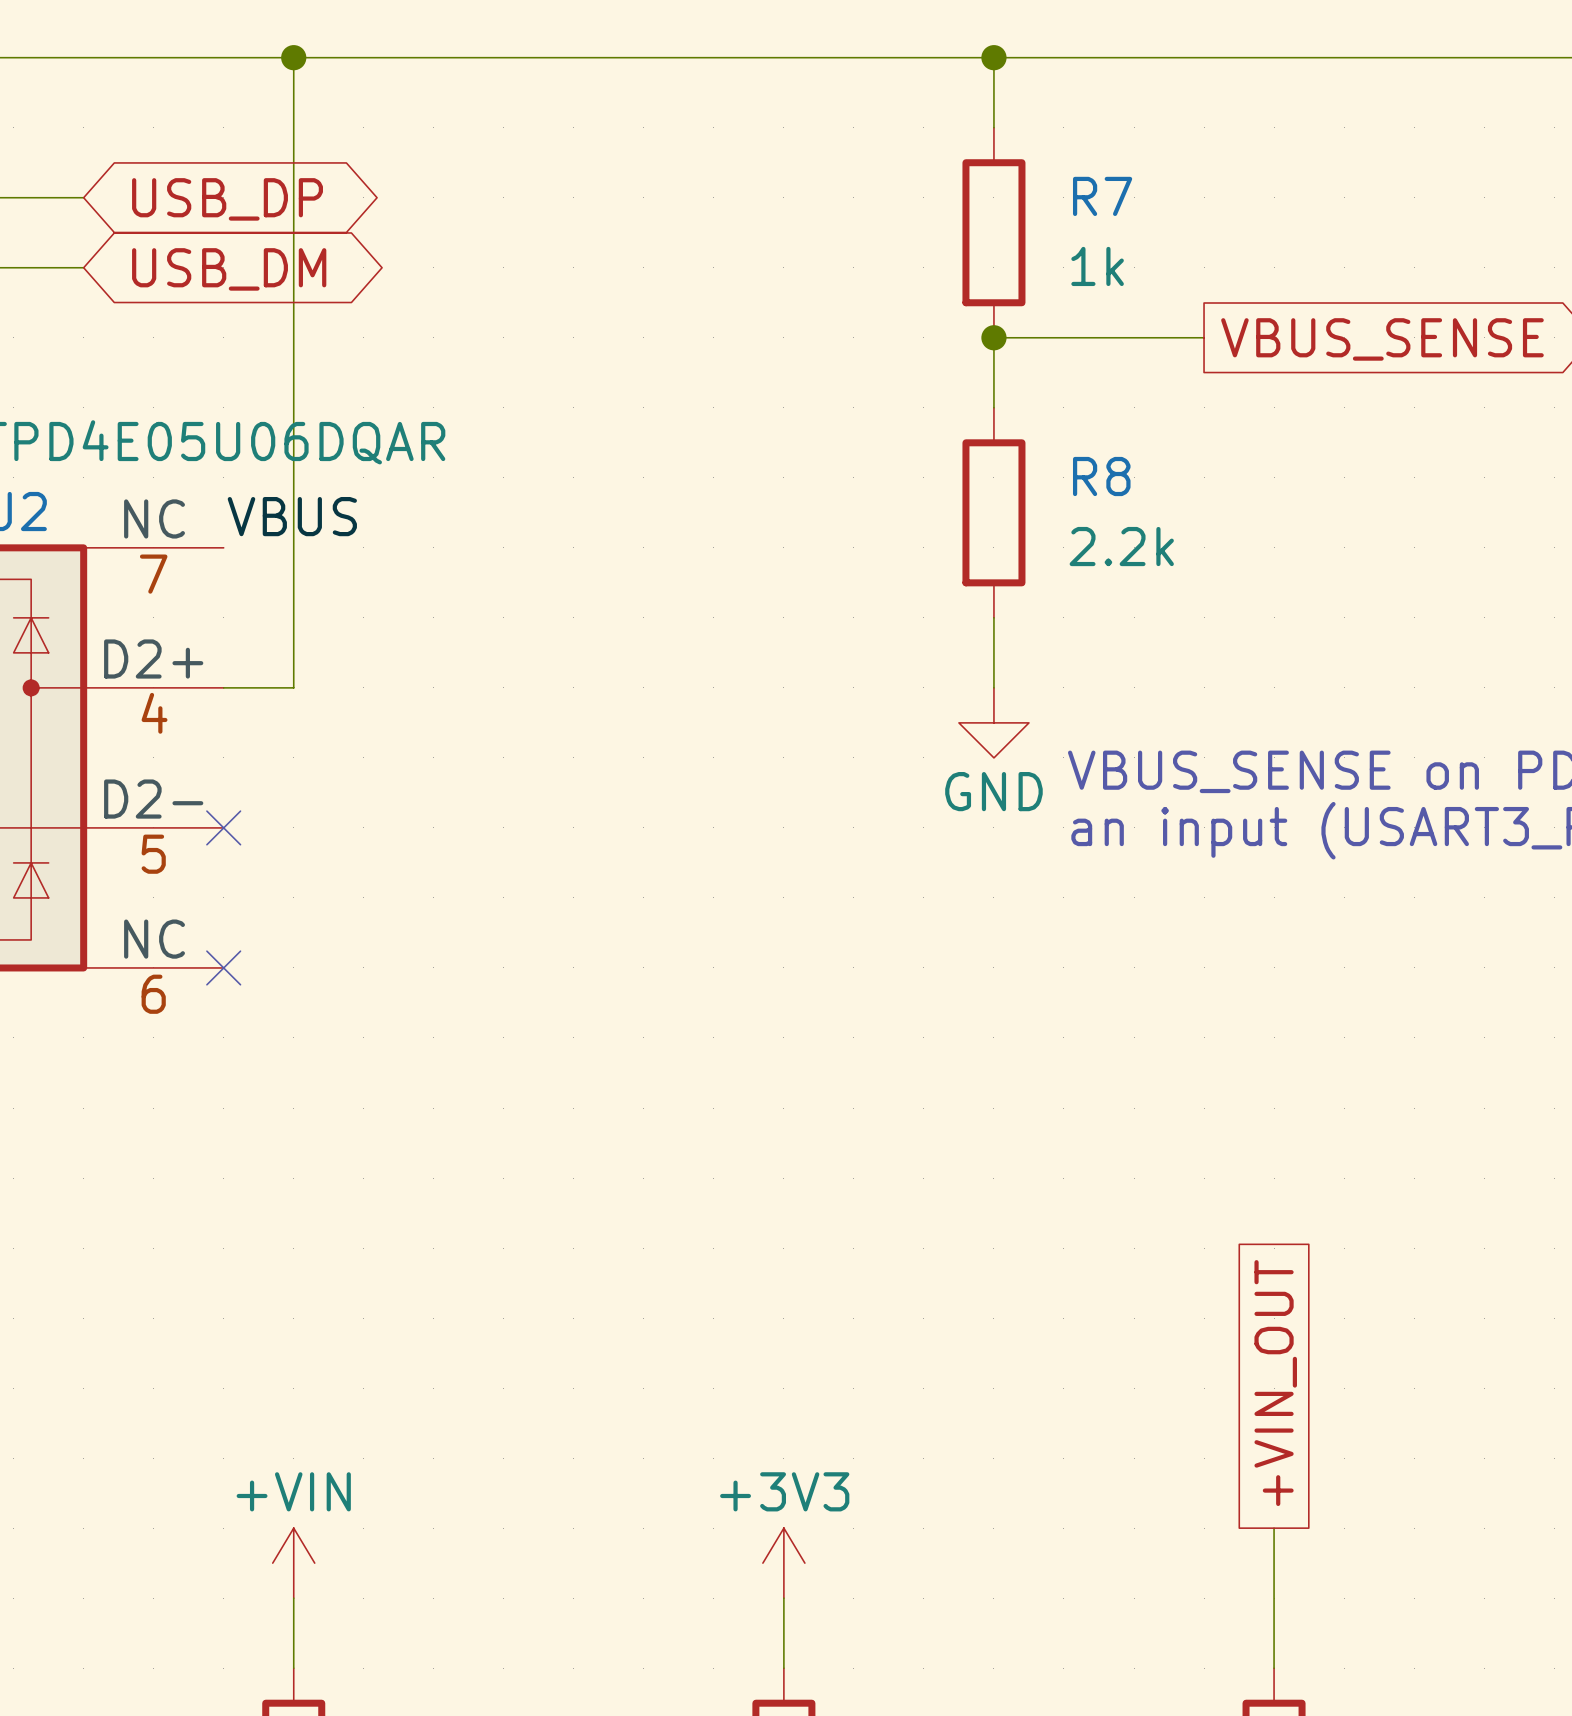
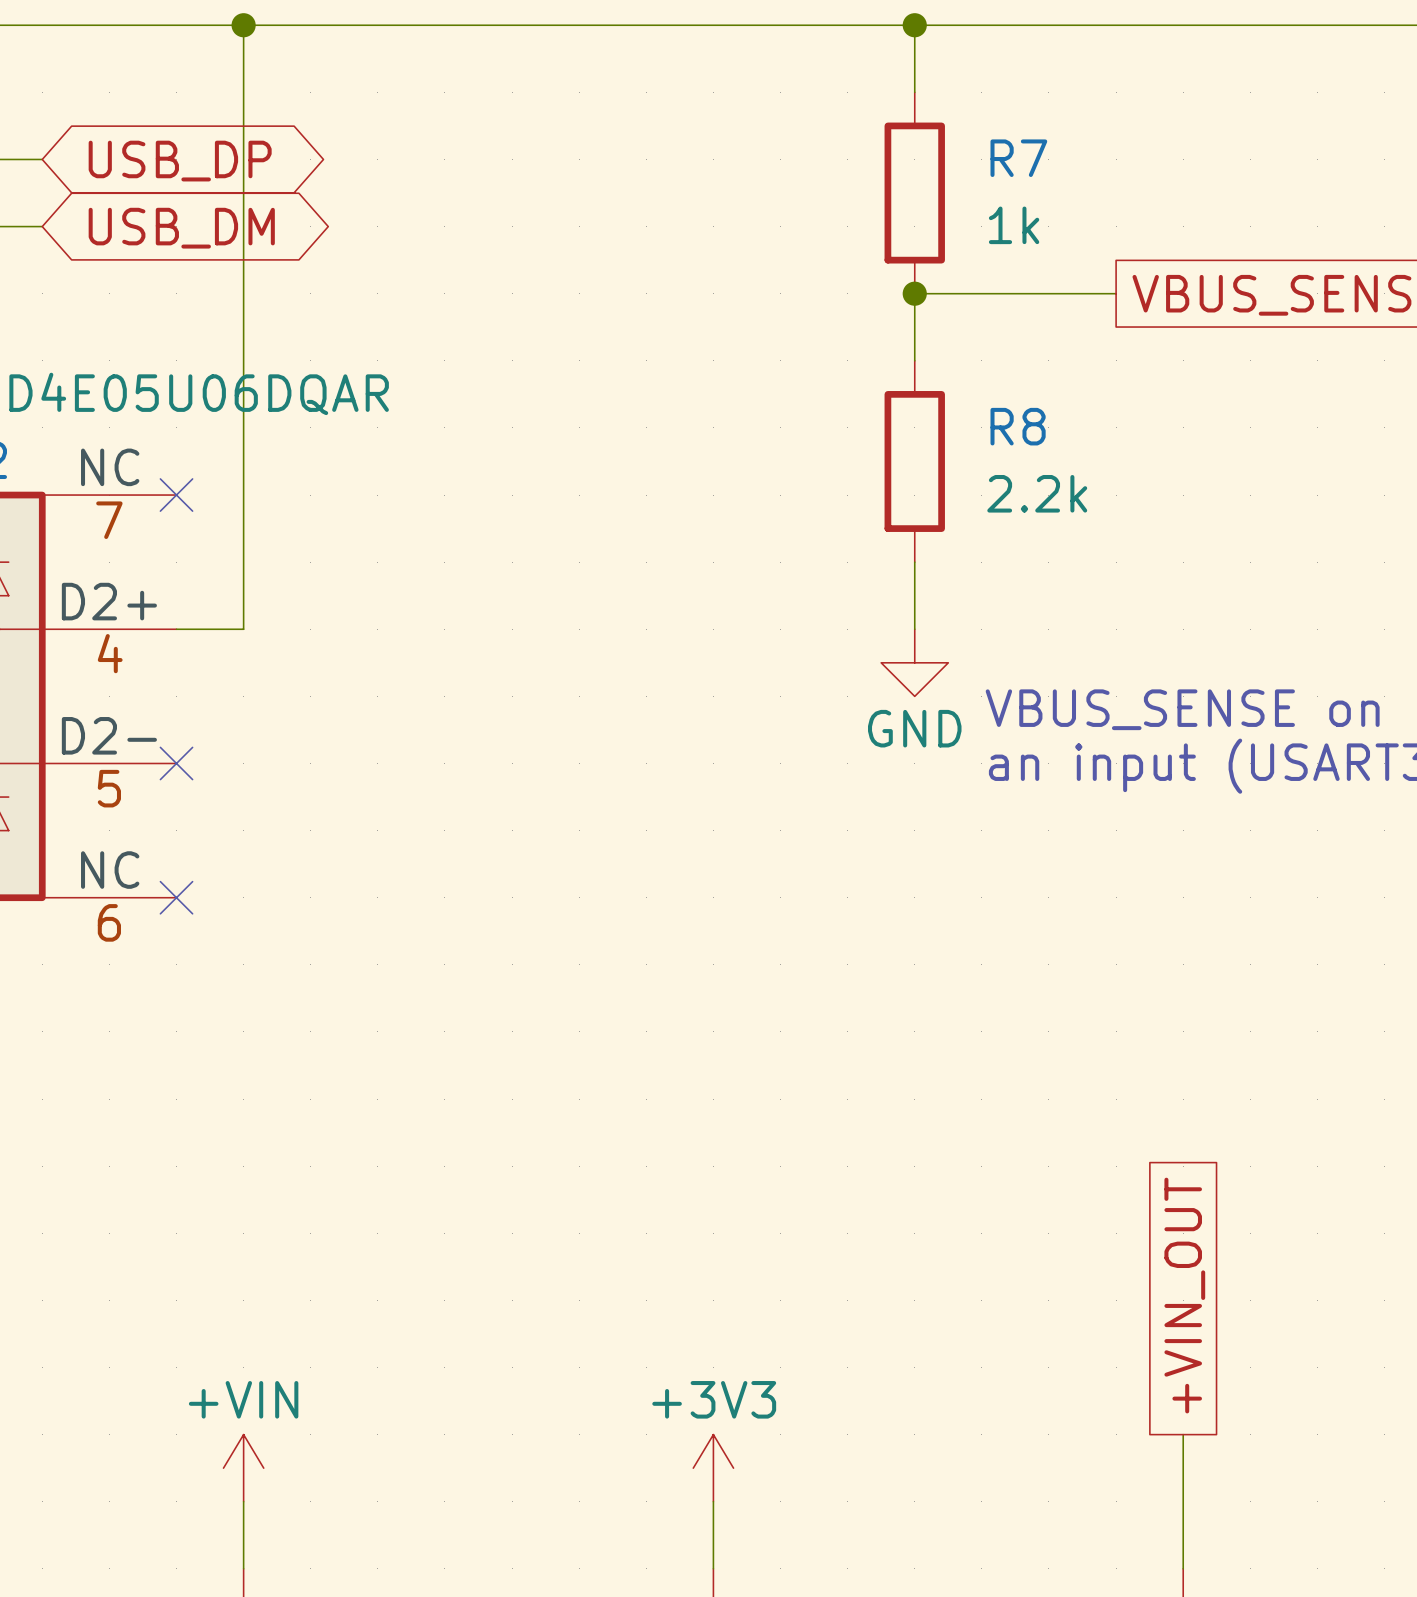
label: VBUS (292, 516) -> none
no-connect mark: none -> (176, 495)

